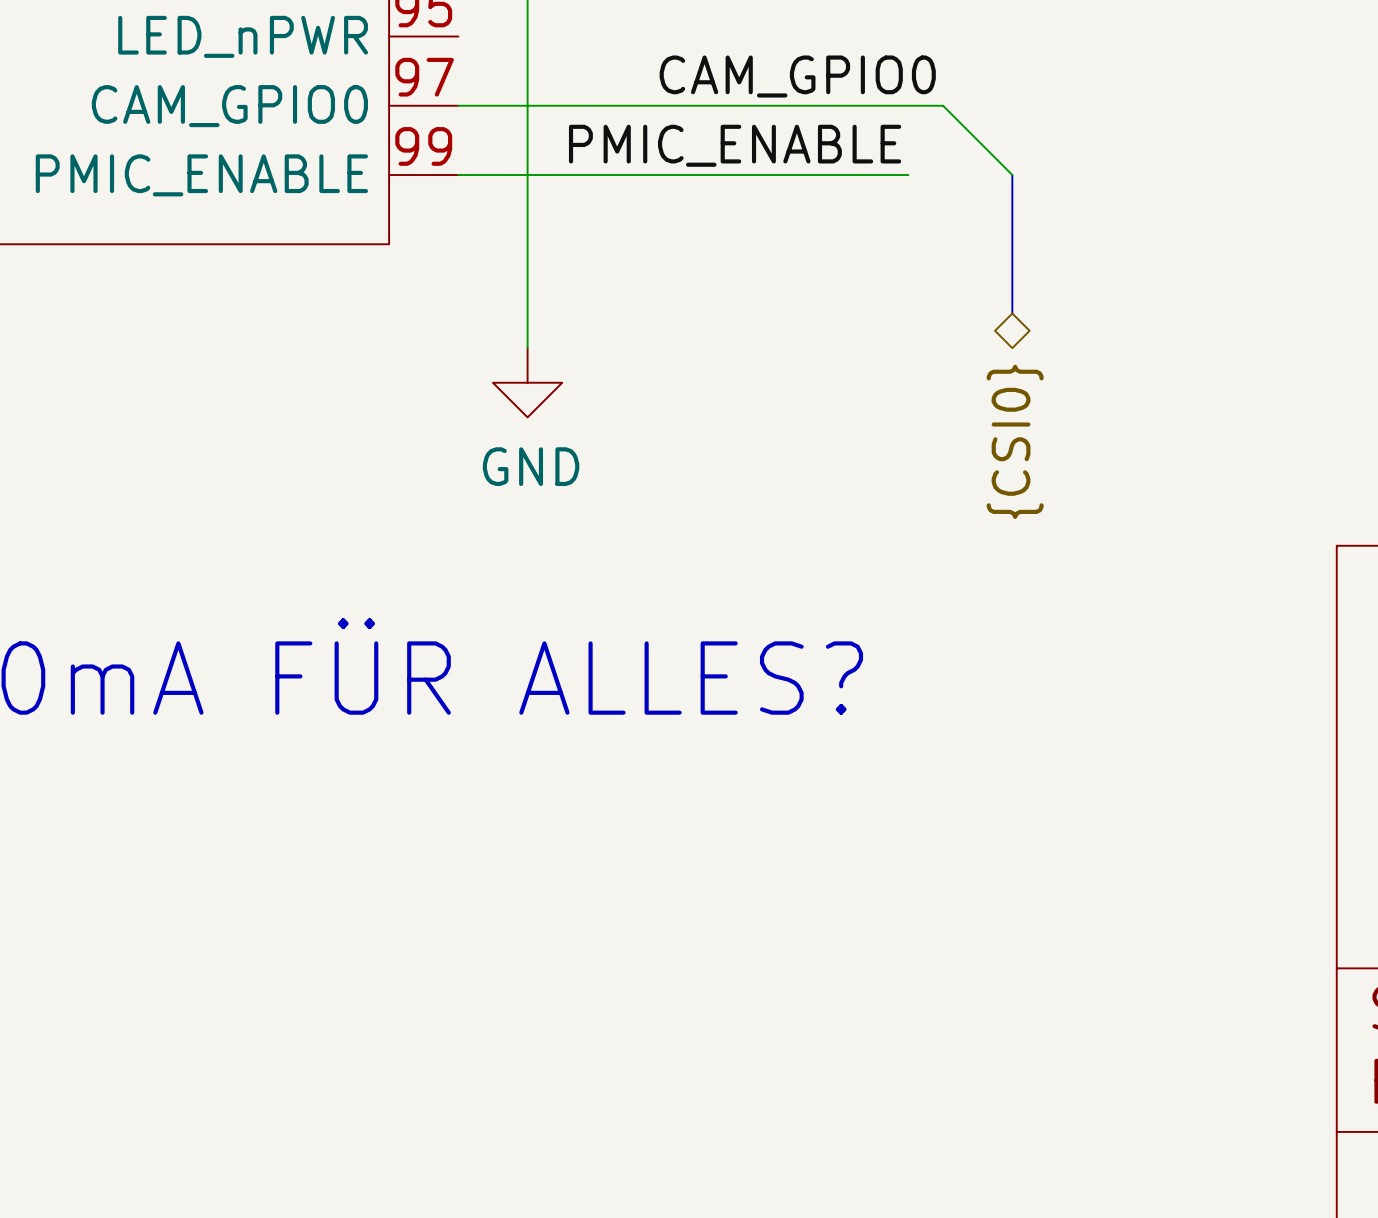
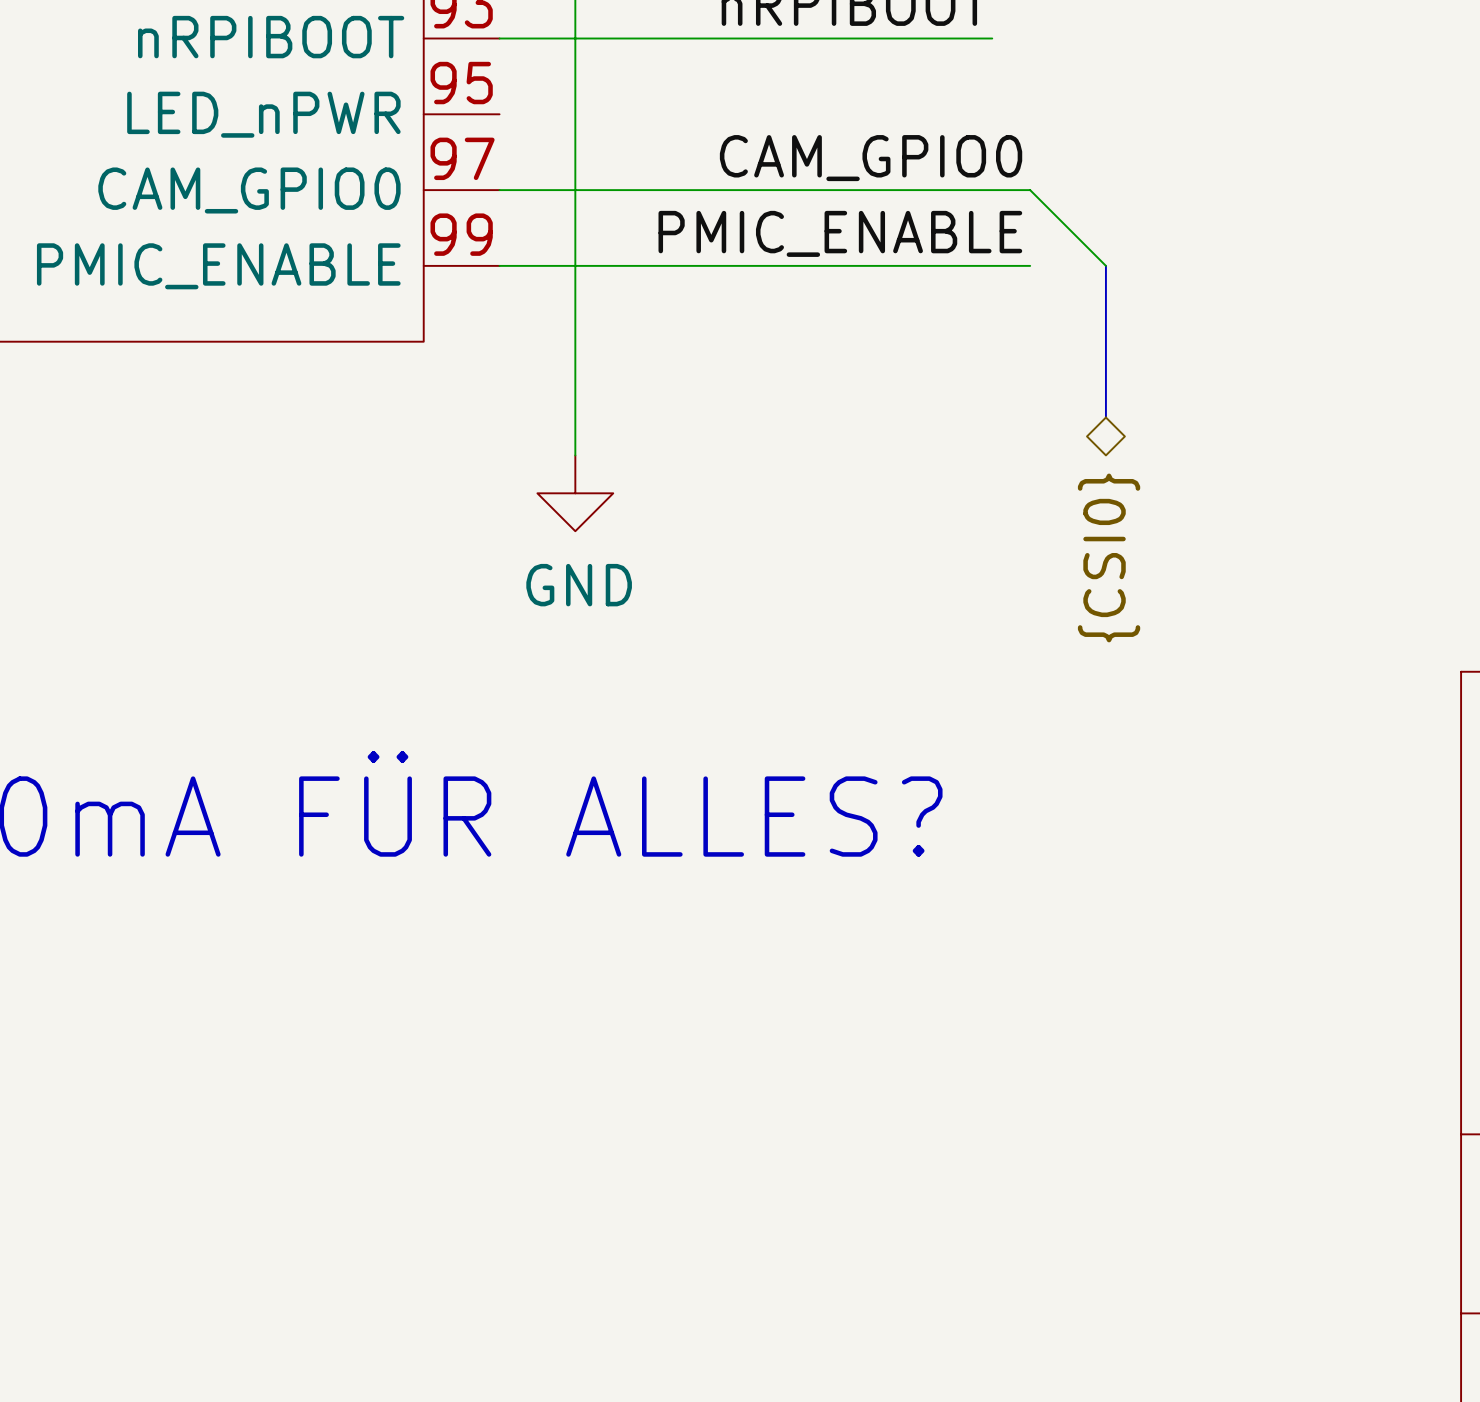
label position: PMIC_ENABLE (735, 145) -> PMIC_ENABLE (840, 233)
wire: none -> (992, 265) (1030, 265)

